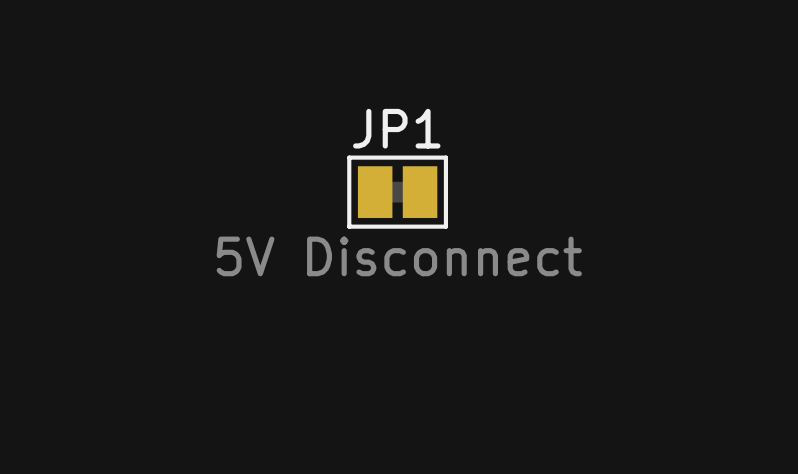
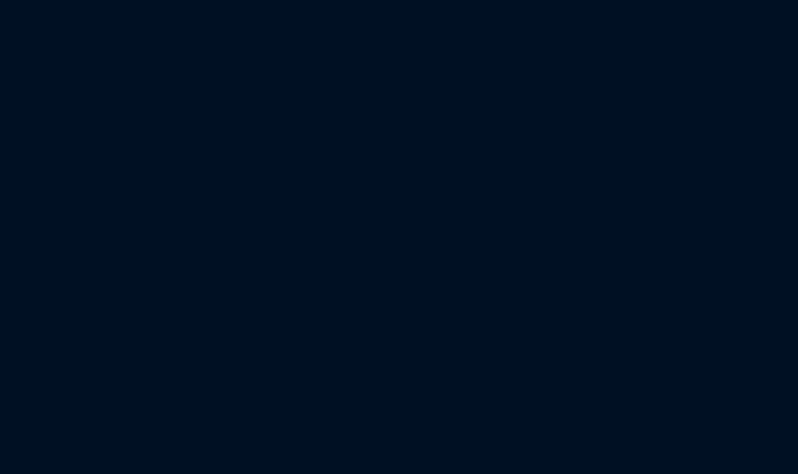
JP1: 5V Disconnect (397, 192) -> none

